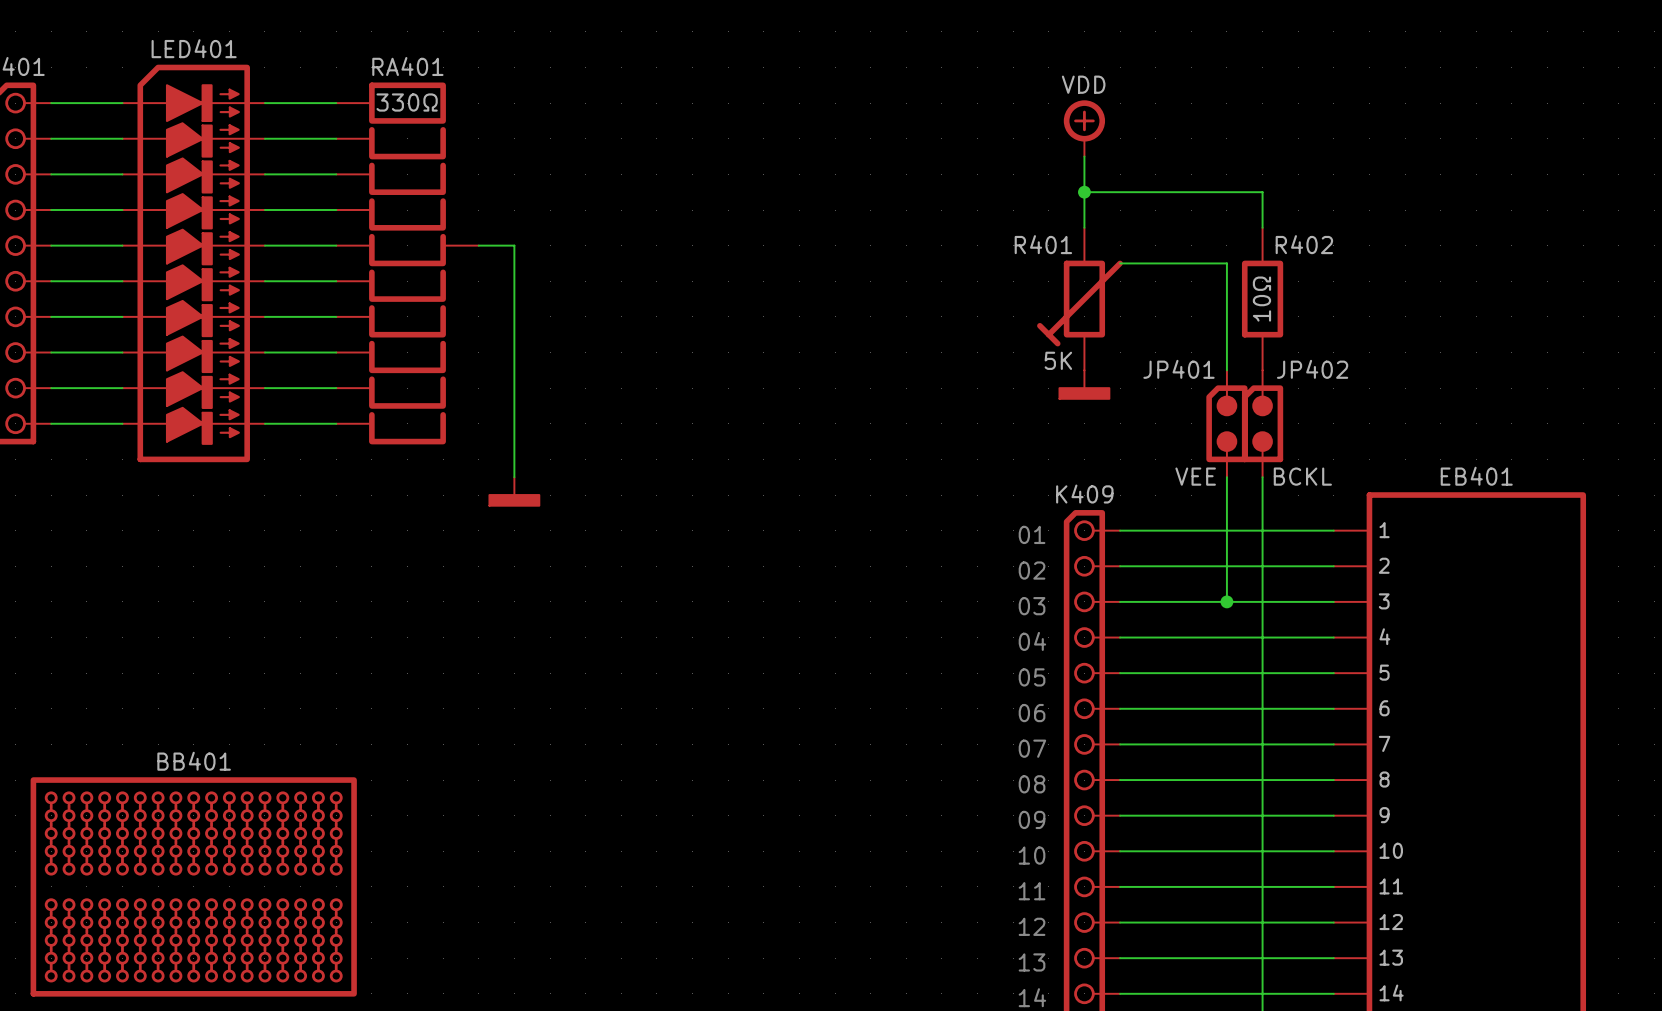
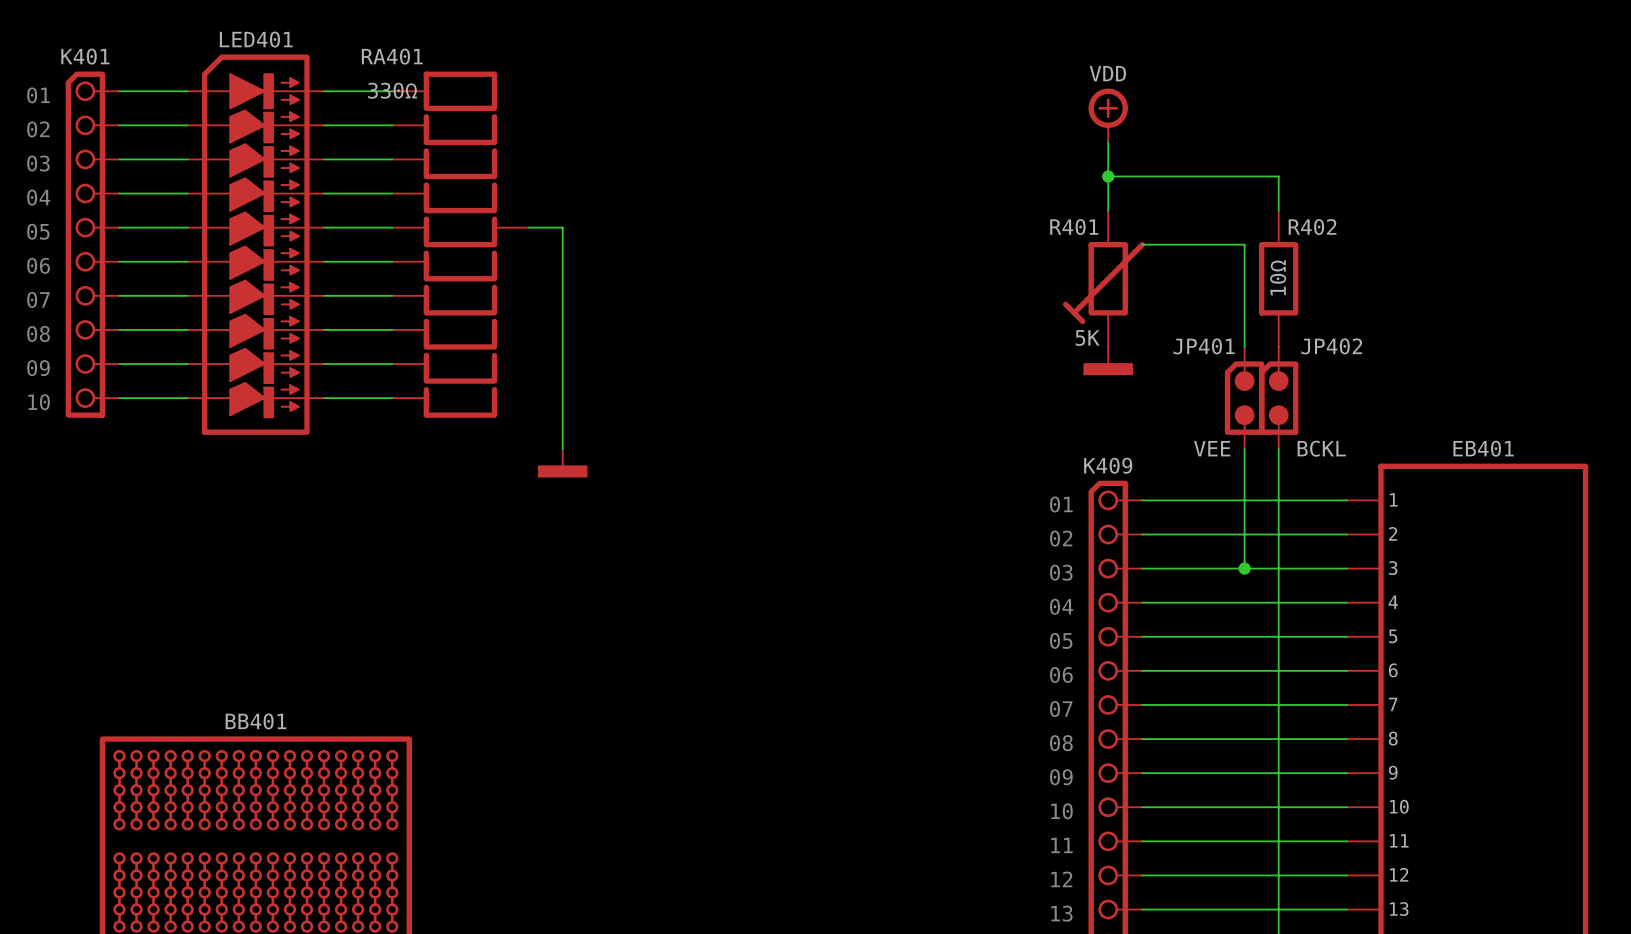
RA401 name position: RA401 (407, 66) -> RA401 (392, 56)
RA401 value position: 330Ω (407, 102) -> 330Ω (392, 90)

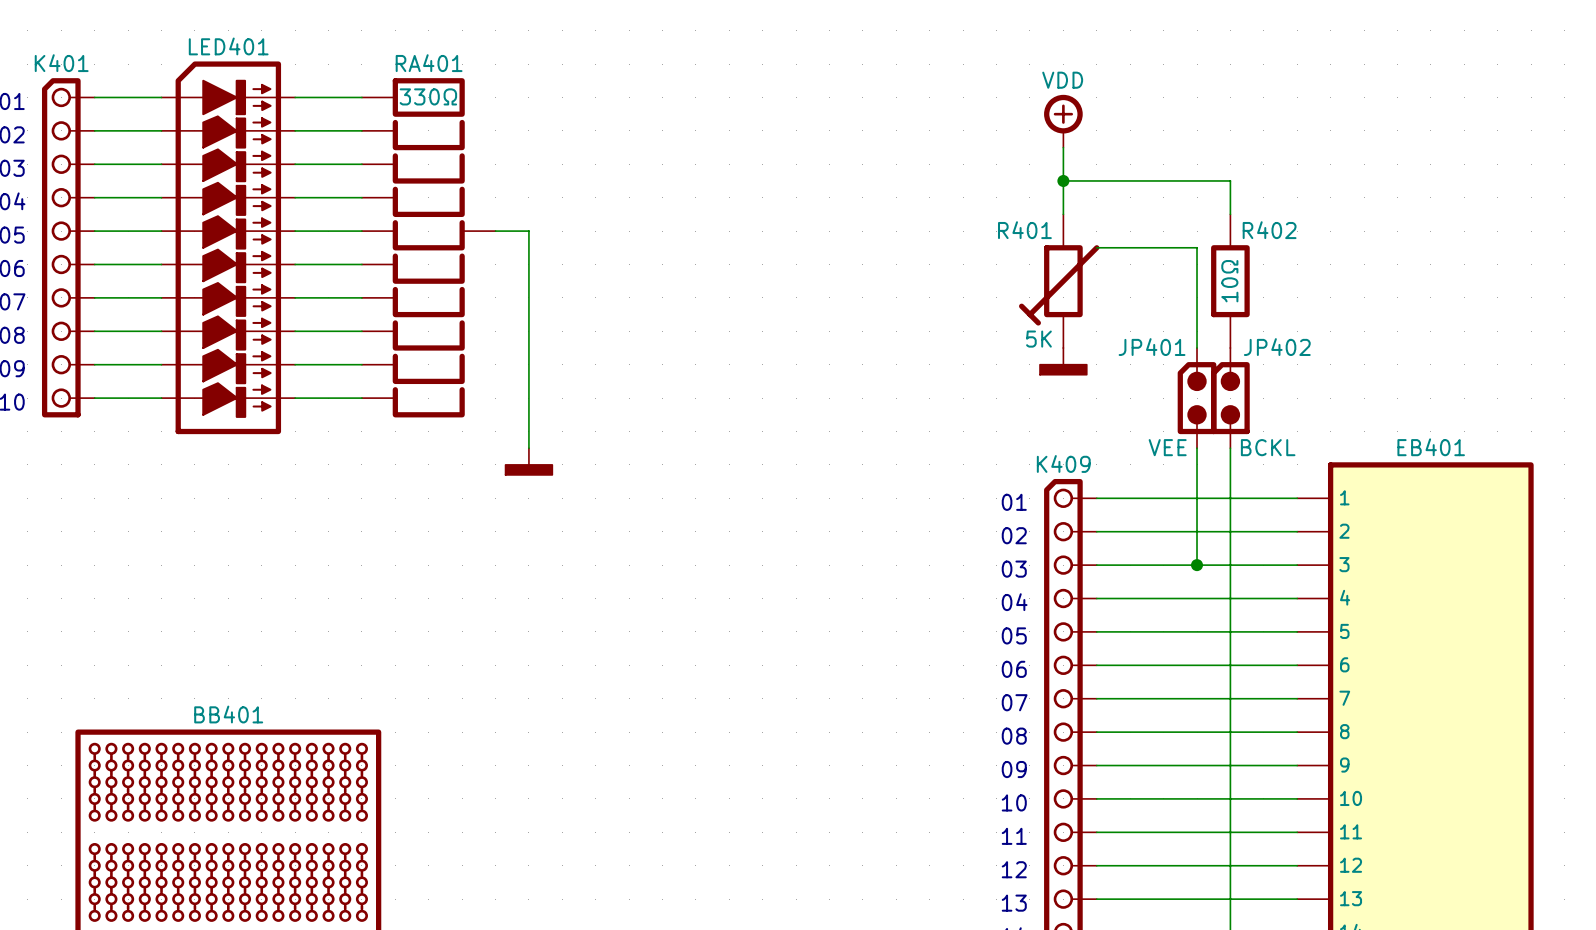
RA401 name position: RA401 (392, 56) -> RA401 (429, 63)
RA401 value position: 330Ω (392, 90) -> 330Ω (428, 96)

